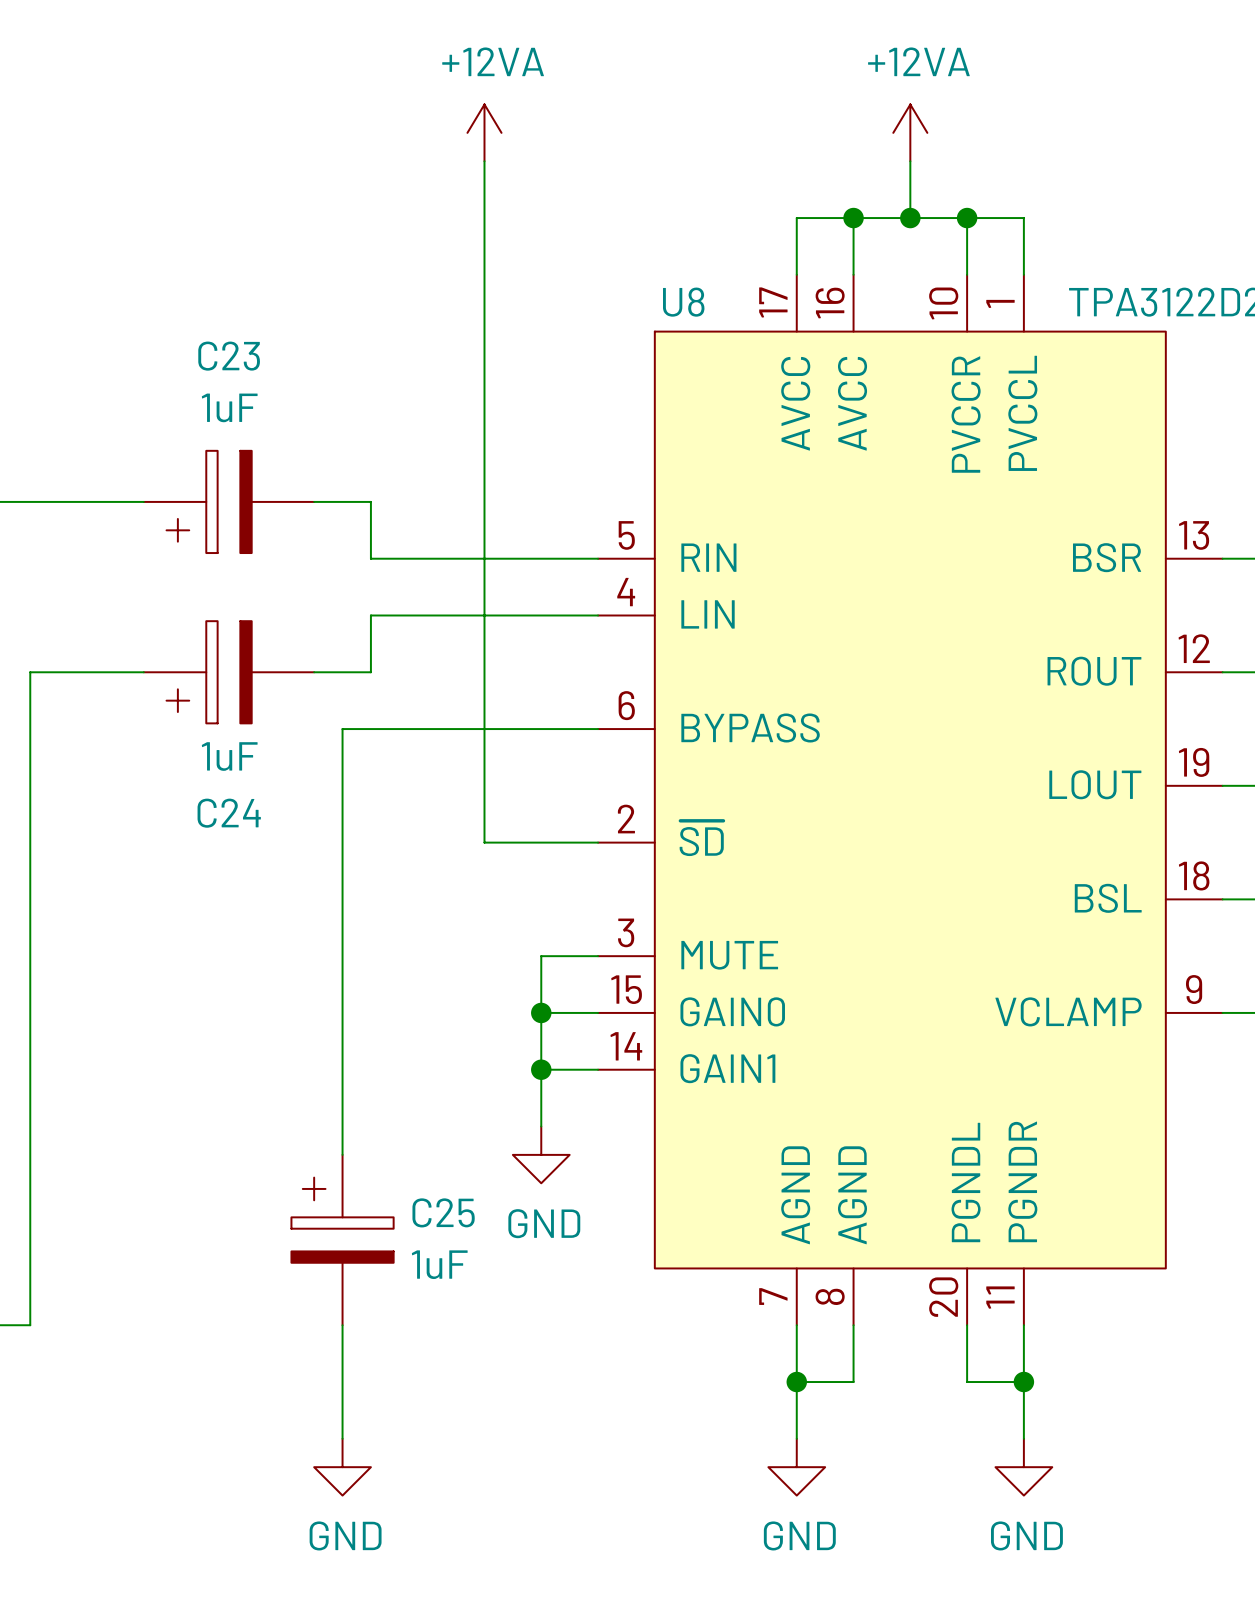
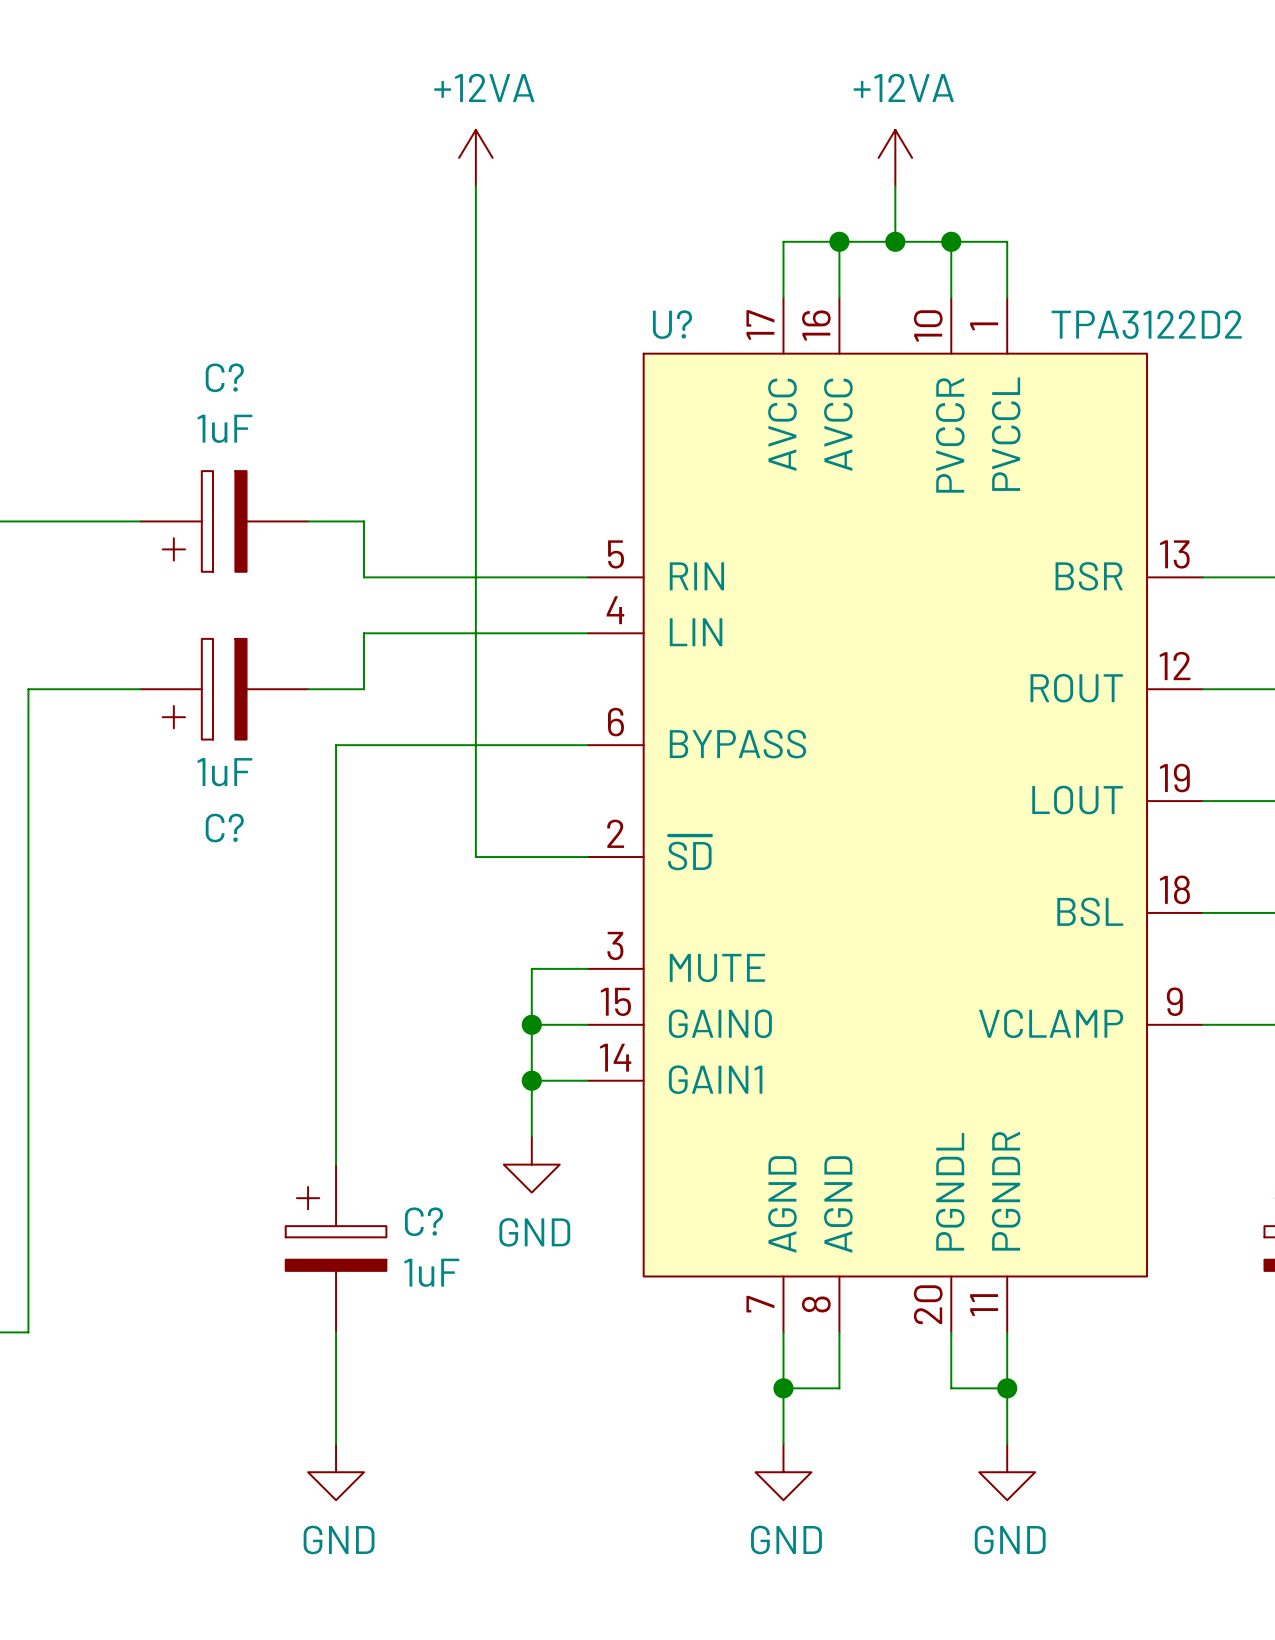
U8 name: U8 (683, 302) -> U? (672, 324)
C23 name: C23 (229, 356) -> C? (224, 377)
C24 name: C24 (229, 813) -> C? (224, 828)
C25 name: C25 (443, 1212) -> C? (423, 1221)

